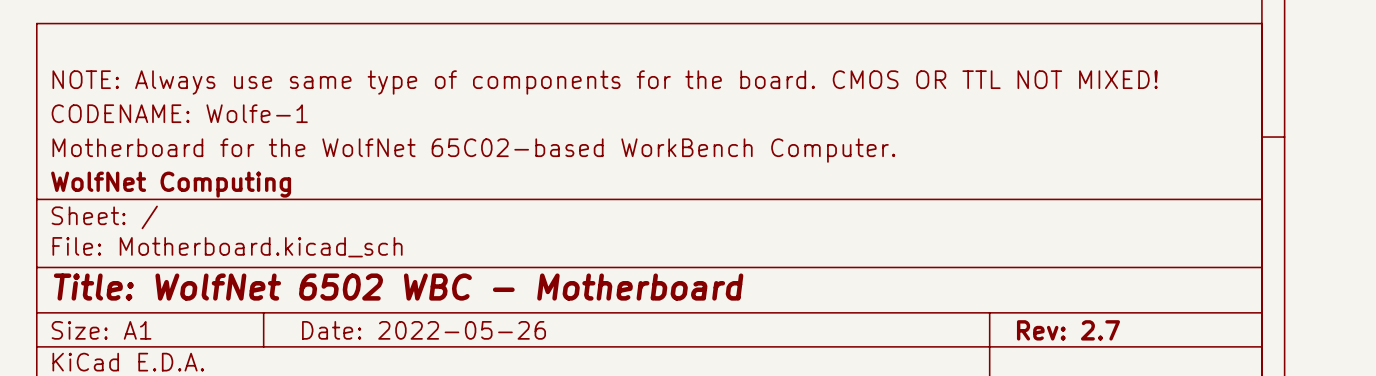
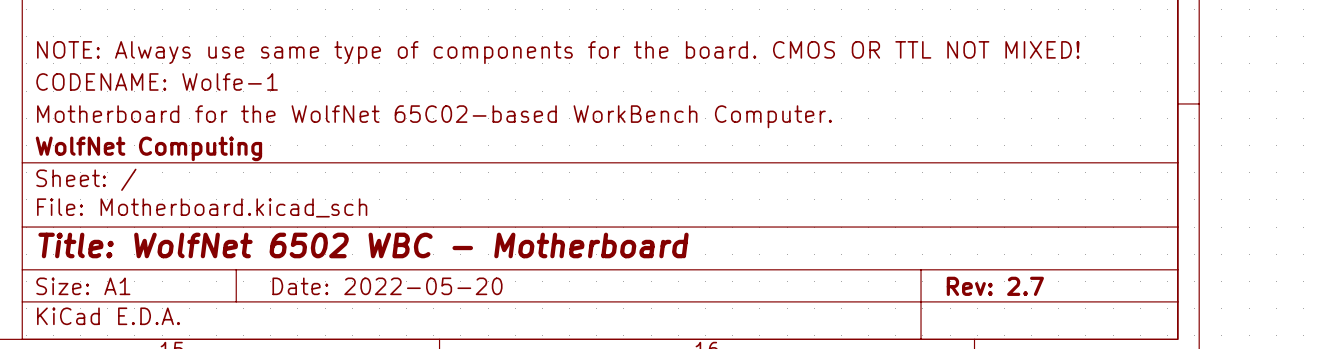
title block: Date: 2022-05-26 (424, 330) -> Date: 2022-05-20 (387, 286)

